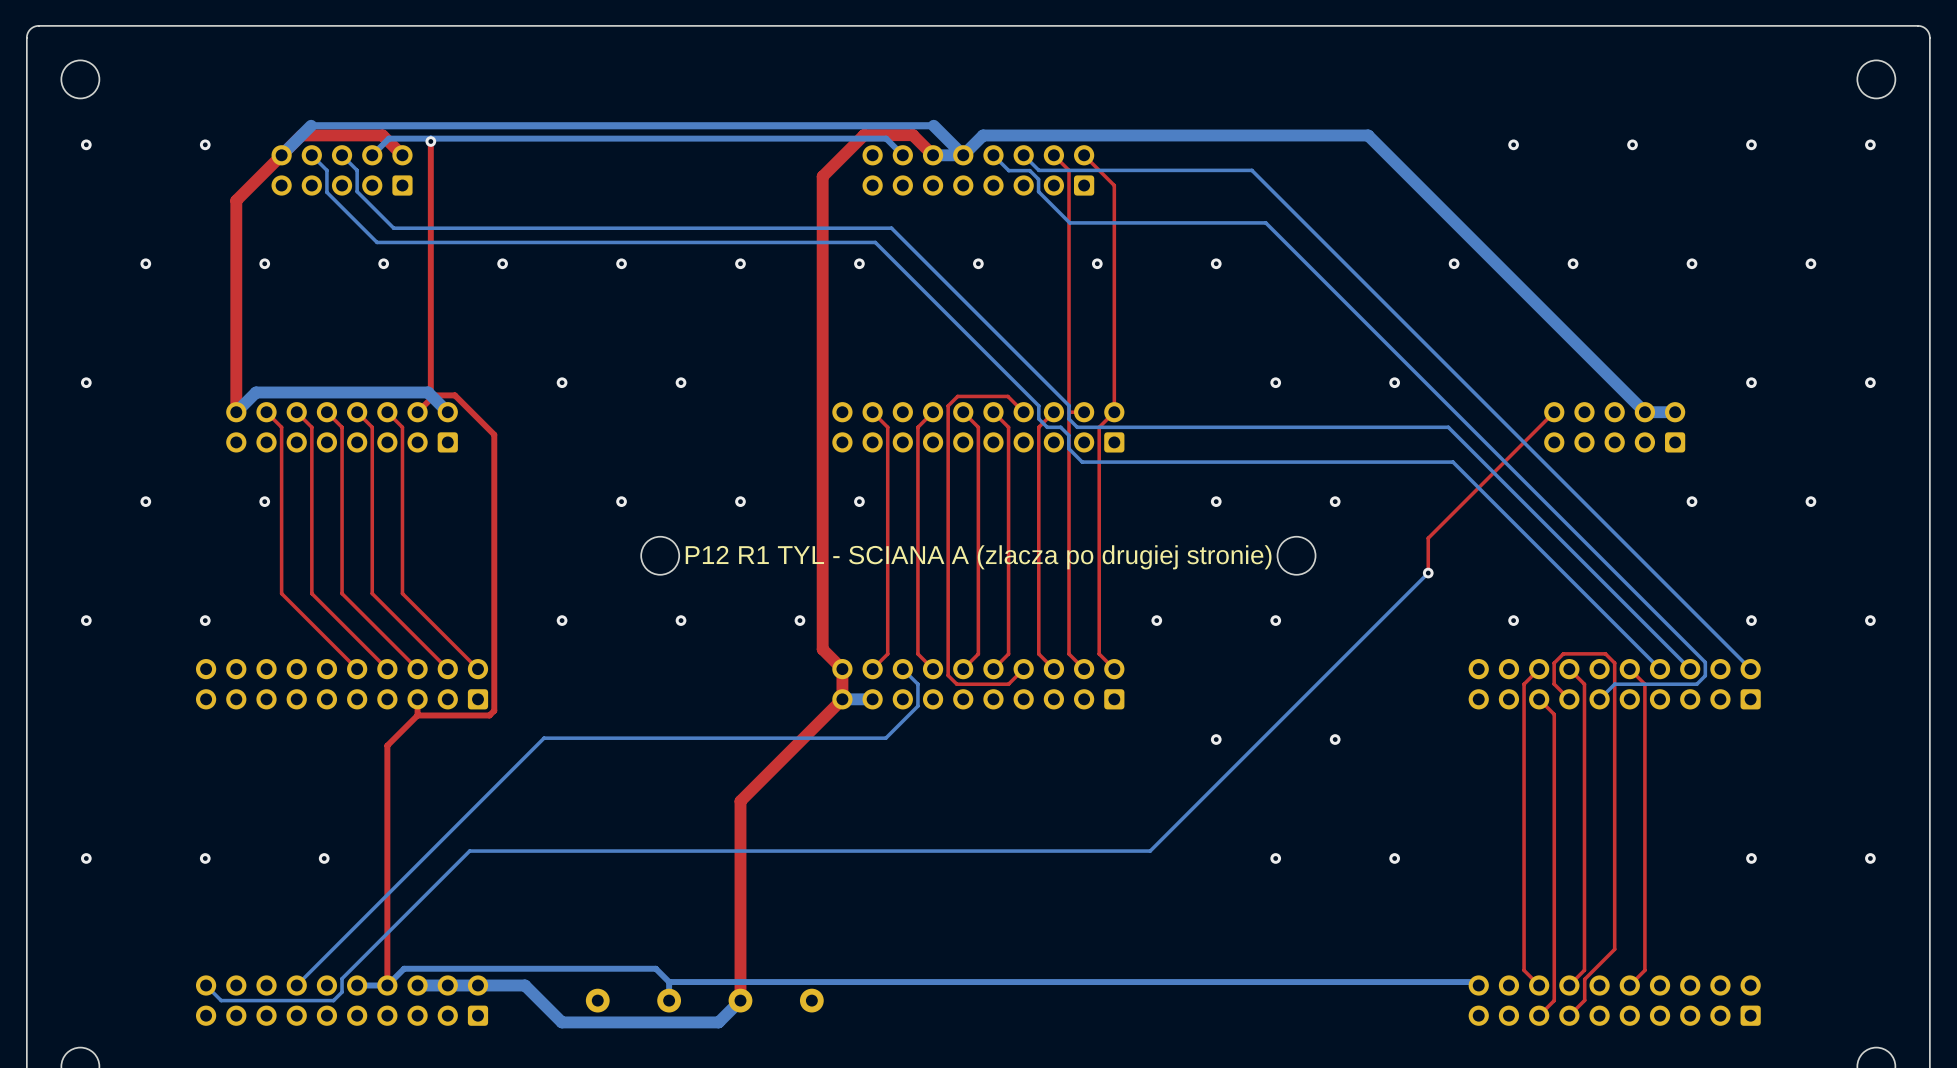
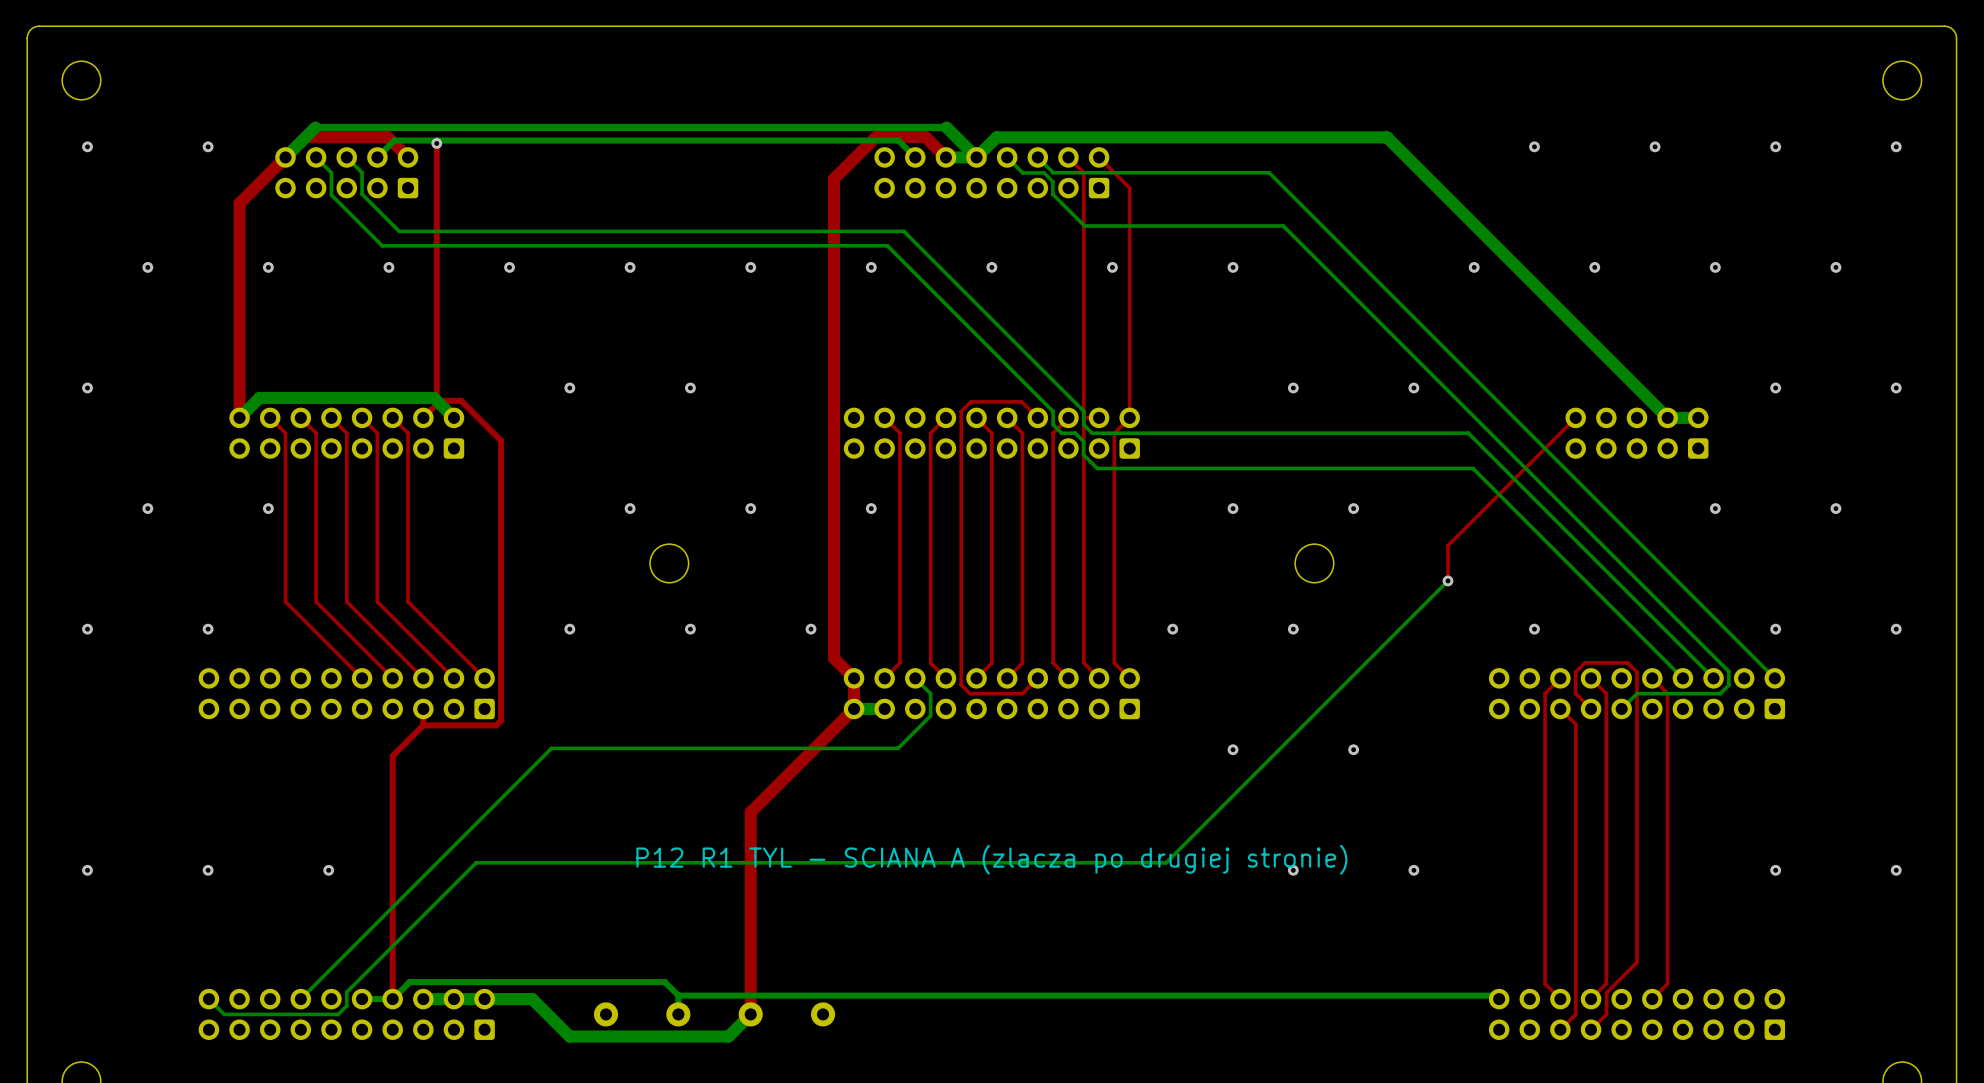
text position: P12 R1 TYL - SCIANA A (zlacza po drugiej stronie) (978, 557) -> P12 R1 TYL - SCIANA A (zlacza po drugiej stronie) (991, 859)

